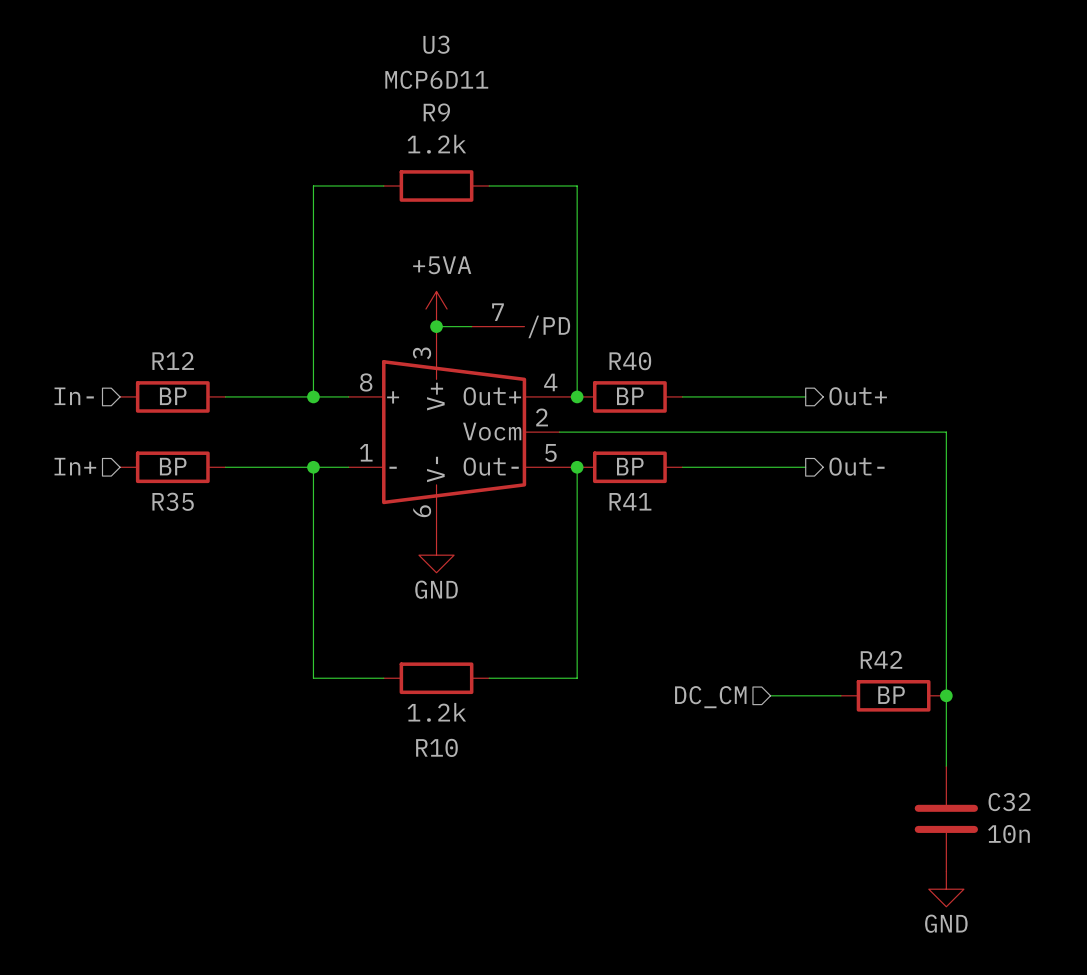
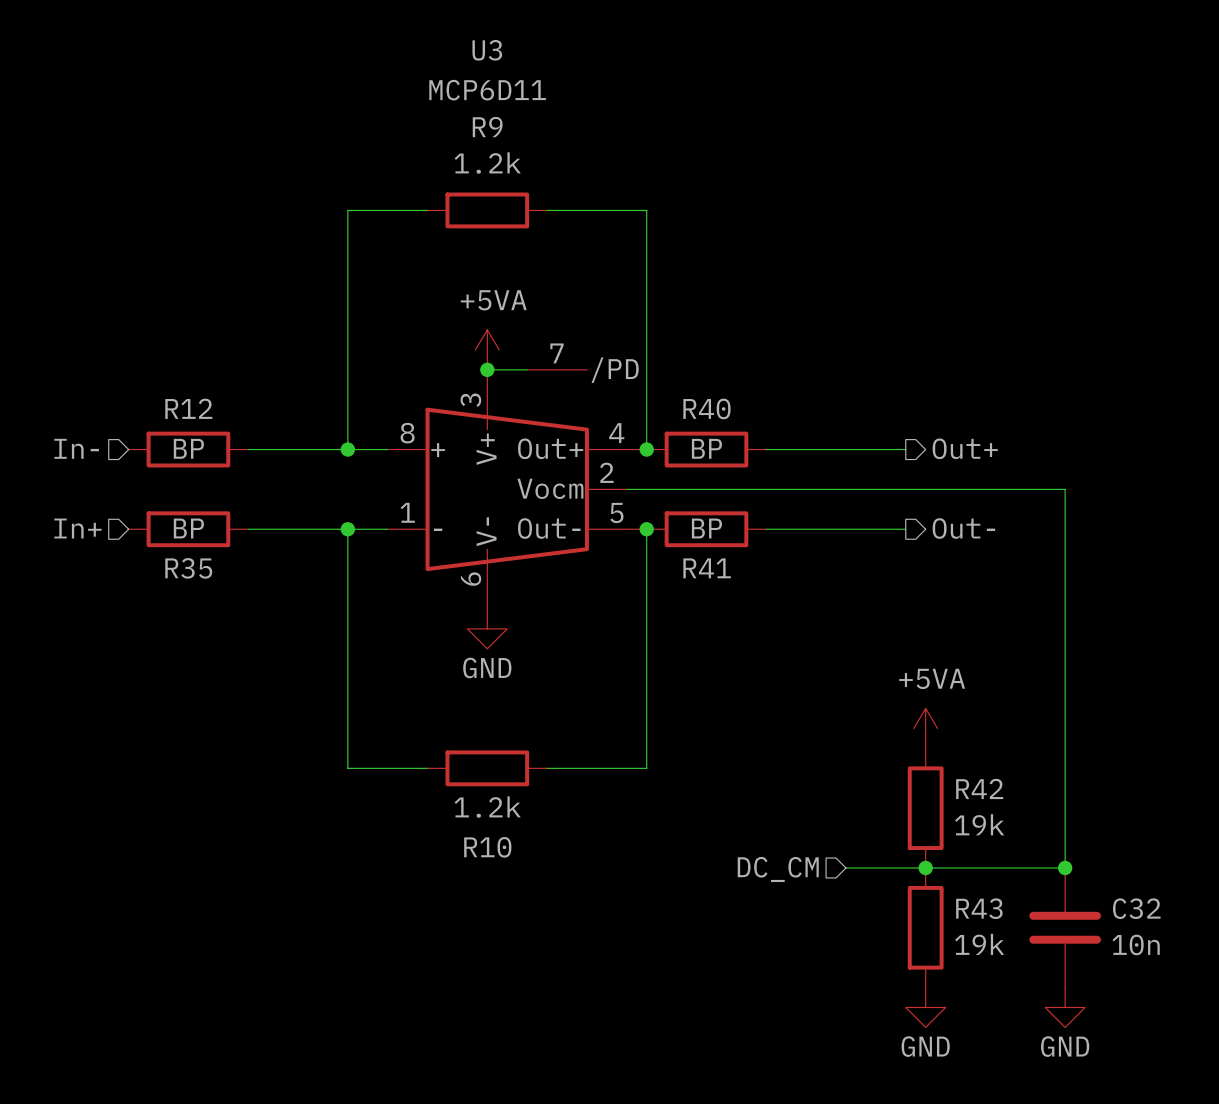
power symbol: none -> +5VA (925, 728)
wire: (770, 695) (840, 695) -> none
R42 value: BP (891, 695) -> 19k (979, 824)
R42 rotation: 0° (893, 695) -> 90° clockwise (925, 808)
R42 position: (893, 695) -> (925, 808)
junction position: (946, 695) -> (1065, 867)
hierarchical label position: DC_CM (710, 697) -> DC_CM (778, 869)
wire: none -> (845, 867) (1065, 867)
junction: none -> (925, 867)
R43: none -> 19k (925, 927)
power symbol: none -> GND (925, 1007)

